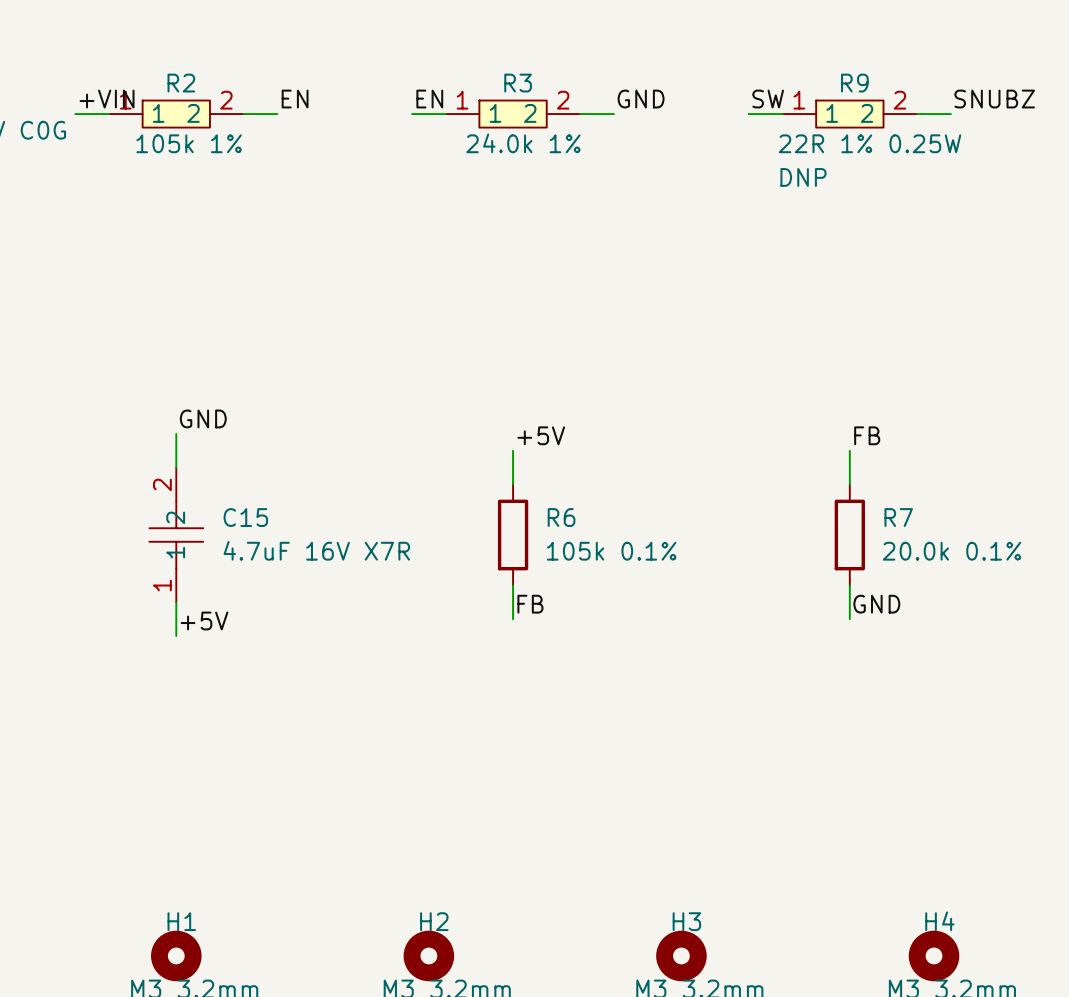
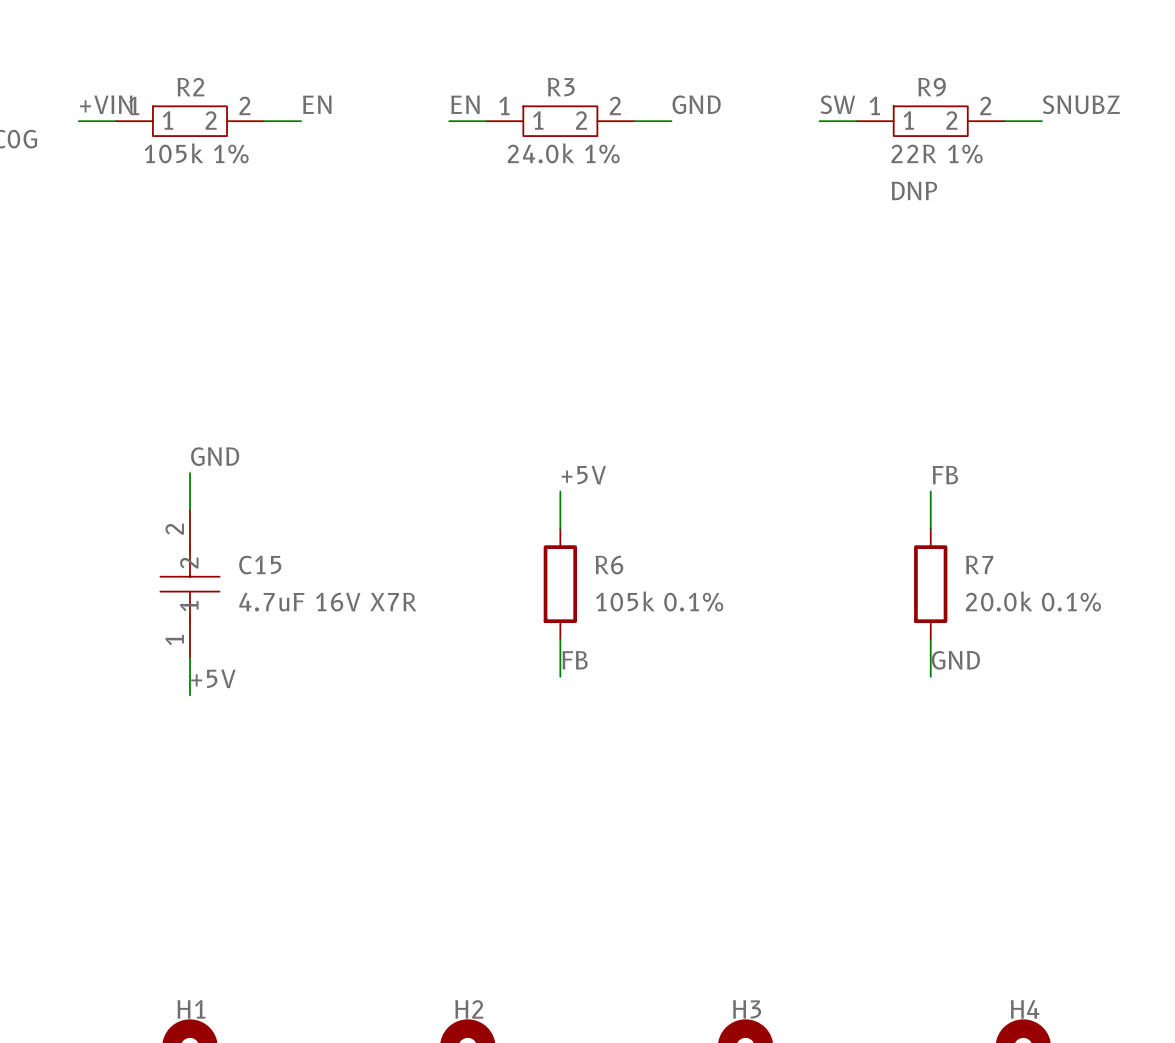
R9 value: 22R 1% 0.25W (870, 143) -> 22R 1% (937, 153)
R9 text position: DNP (803, 177) -> DNP (914, 190)

